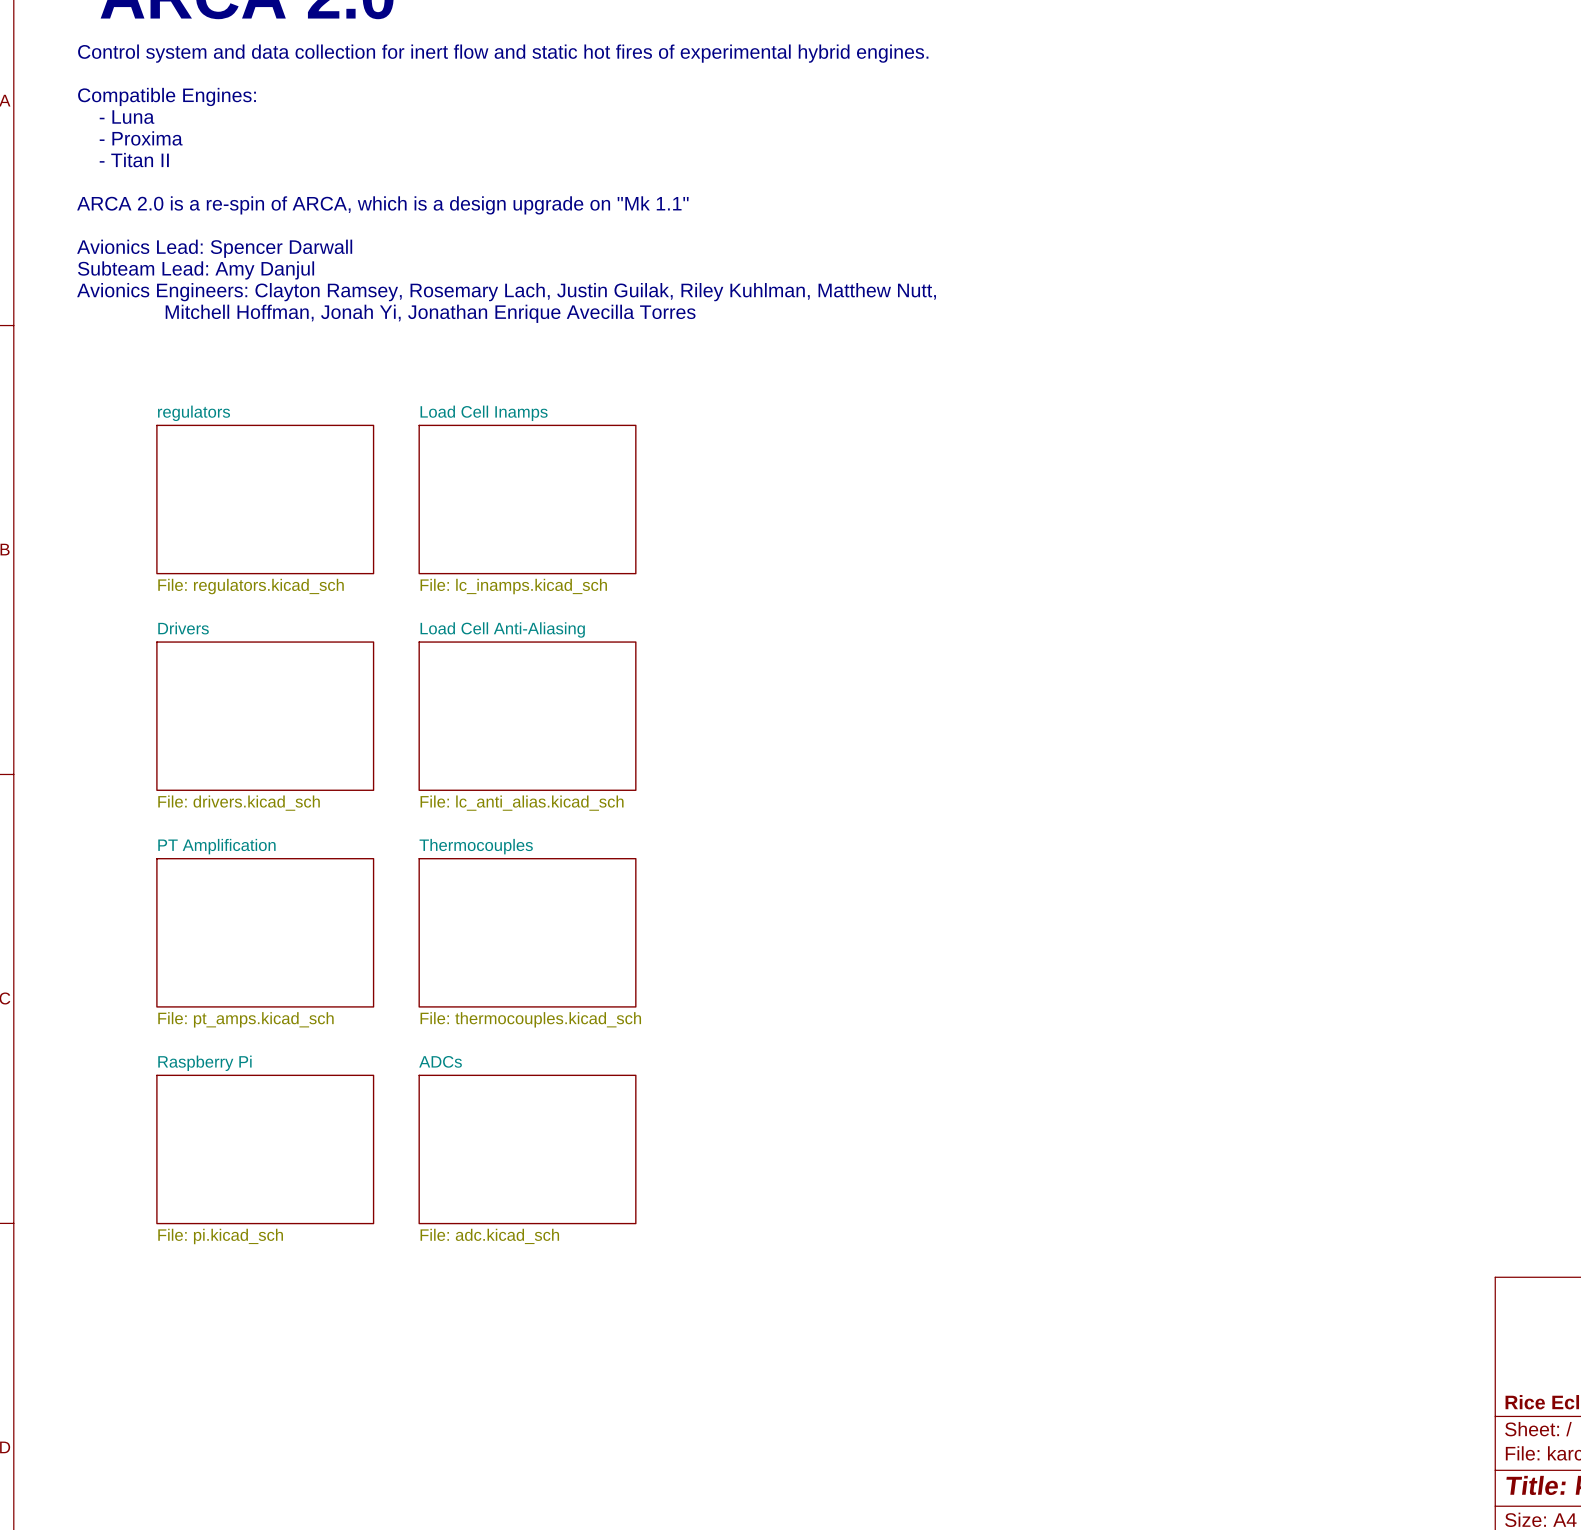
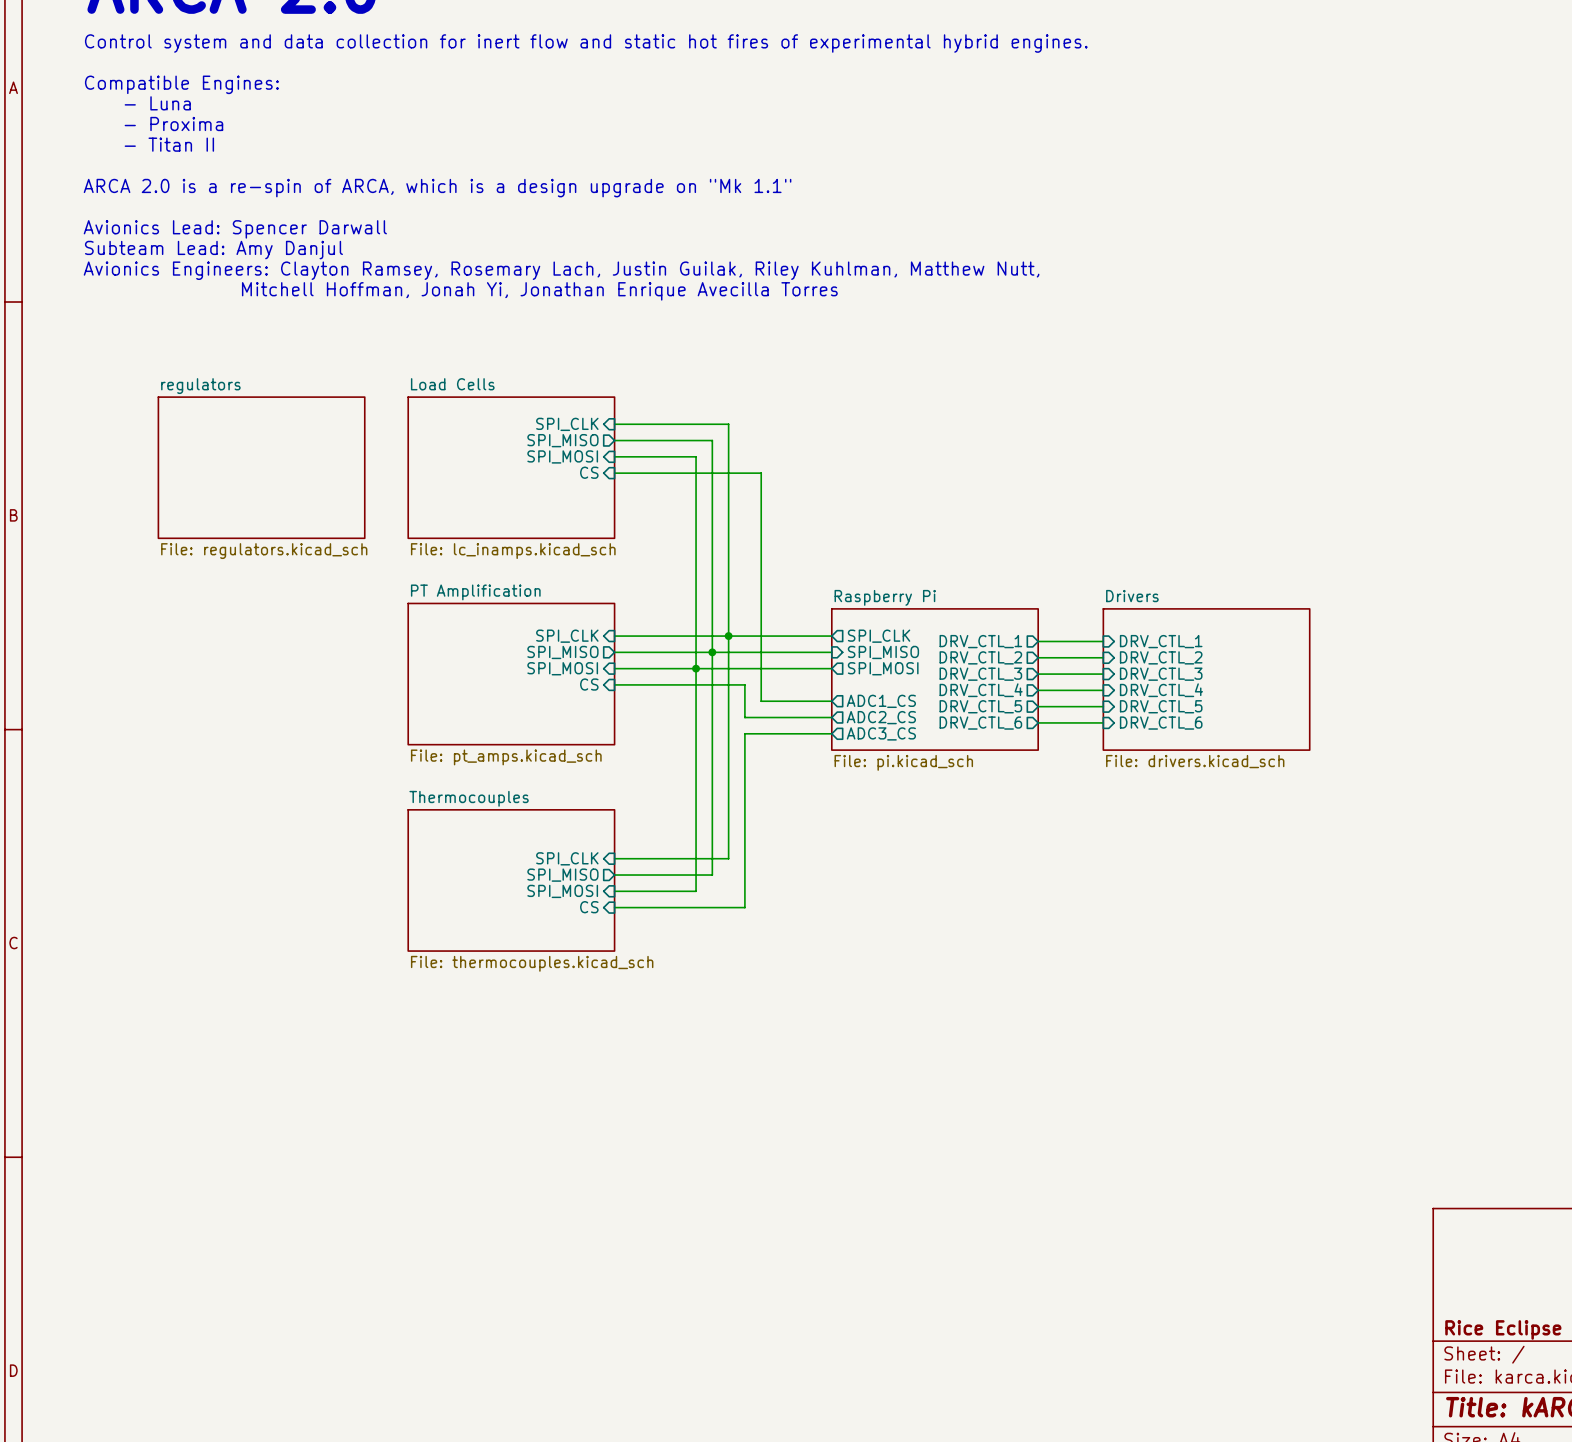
sheet Load Cell Inamps name: Load Cell Inamps (484, 413) -> Load Cells (452, 384)
wire: none -> (614, 424) (728, 424) (728, 858) (614, 858)
sheet pin: none -> SPI_CLK (567, 424)
wire: none -> (614, 440) (712, 440) (712, 875) (614, 875)
sheet pin: none -> SPI_MISO (562, 440)
wire: none -> (614, 456) (696, 456) (696, 891) (614, 891)
sheet pin: none -> SPI_MOSI (562, 456)
sheet pin: none -> CS (589, 472)
wire: none -> (614, 473) (761, 473) (761, 701) (831, 701)
sheet Load Cell Anti-Aliasing name: Load Cell Anti-Aliasing (502, 629) -> PT Amplification (475, 592)
wire: none -> (614, 636) (831, 636)
junction: none -> (728, 636)
sheet pin: none -> SPI_CLK (567, 636)
sheet pin: none -> SPI_CLK (879, 636)
wire: none -> (1038, 641) (1103, 641)
sheet pin: none -> DRV_CTL_1 (980, 641)
sheet pin: none -> DRV_CTL_1 (1161, 641)
wire: none -> (614, 652) (831, 652)
junction: none -> (712, 652)
sheet pin: none -> SPI_MISO (562, 652)
sheet pin: none -> SPI_MISO (883, 652)
wire: none -> (1038, 657) (1103, 657)
sheet pin: none -> DRV_CTL_2 (980, 657)
sheet pin: none -> DRV_CTL_2 (1161, 657)
wire: none -> (614, 668) (831, 668)
junction: none -> (696, 668)
sheet pin: none -> SPI_MOSI (562, 668)
sheet pin: none -> SPI_MOSI (883, 668)
sheet Drivers: File: drivers.kicad_sch (265, 716) -> none
wire: none -> (1038, 674) (1103, 674)
sheet pin: none -> DRV_CTL_3 (980, 674)
sheet pin: none -> DRV_CTL_3 (1161, 674)
sheet Raspberry Pi: none -> File: pi.kicad_sch (934, 679)
sheet Drivers: none -> File: drivers.kicad_sch (1206, 679)
sheet pin: none -> CS (589, 684)
wire: none -> (614, 684) (744, 684) (744, 717) (831, 717)
wire: none -> (1038, 690) (1103, 690)
sheet pin: none -> DRV_CTL_4 (981, 690)
sheet pin: none -> DRV_CTL_4 (1161, 690)
sheet pin: none -> ADC1_CS (881, 701)
wire: none -> (1038, 706) (1103, 706)
sheet pin: none -> DRV_CTL_5 (980, 706)
sheet pin: none -> DRV_CTL_5 (1161, 706)
sheet pin: none -> ADC2_CS (881, 717)
wire: none -> (1038, 722) (1103, 722)
sheet pin: none -> DRV_CTL_6 (980, 723)
sheet pin: none -> DRV_CTL_6 (1161, 723)
wire: none -> (831, 733) (744, 733) (744, 907) (614, 907)
sheet pin: none -> ADC3_CS (881, 733)
sheet Load Cell Anti-Aliasing value: File: lc_anti_alias.kicad_sch (522, 803) -> File: pt_amps.kicad_sch (506, 757)
sheet pin: none -> SPI_CLK (567, 858)
sheet pin: none -> SPI_MISO (562, 875)
sheet PT Amplification: File: pt_amps.kicad_sch (265, 932) -> none
sheet pin: none -> SPI_MOSI (562, 891)
sheet pin: none -> CS (589, 907)
sheet Raspberry Pi: File: pi.kicad_sch (265, 1149) -> none
sheet ADCs: File: adc.kicad_sch (527, 1149) -> none

